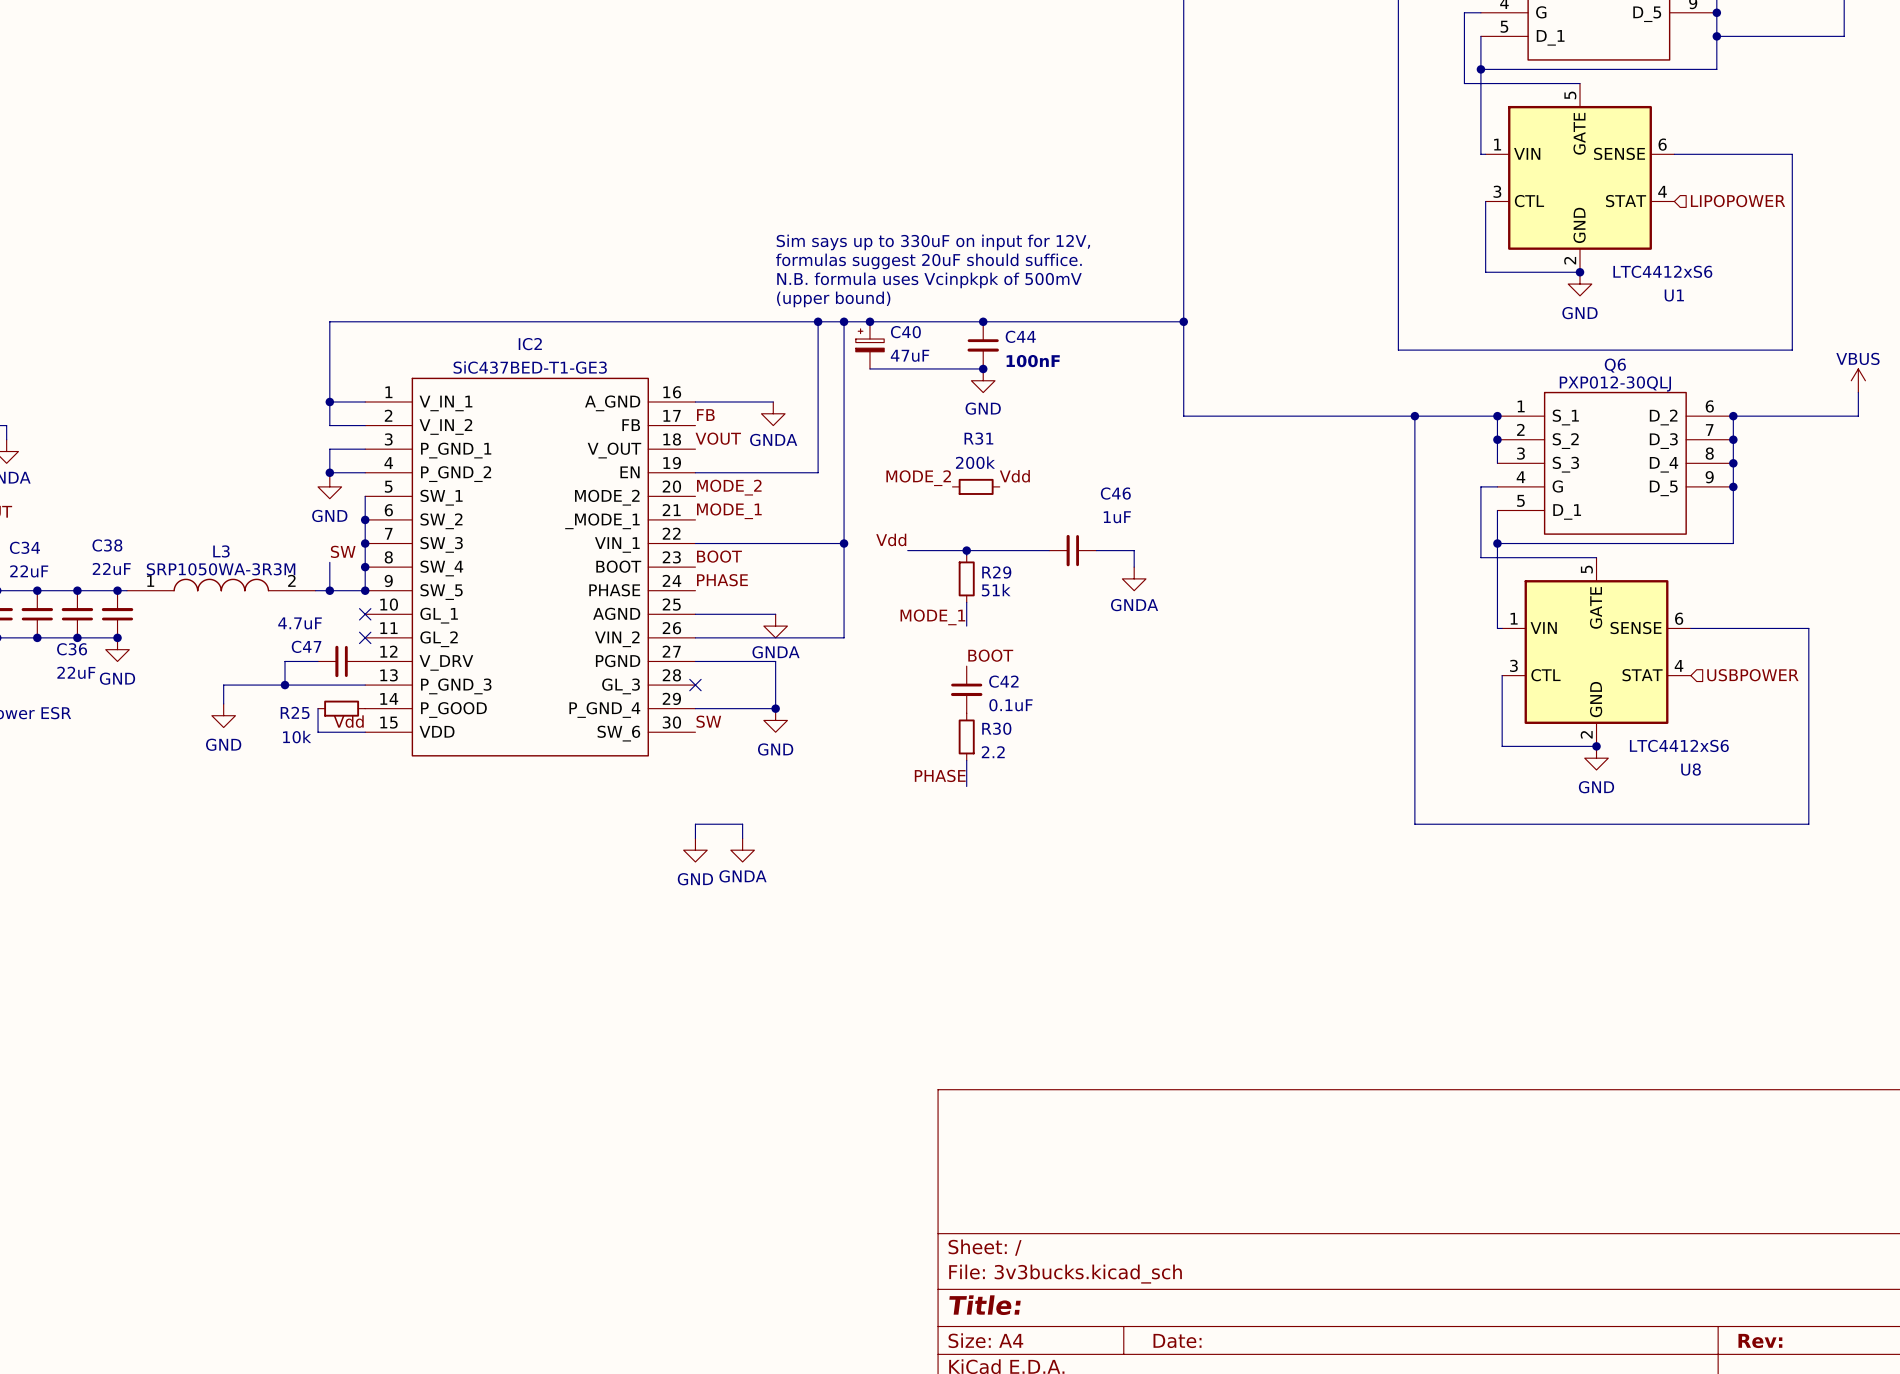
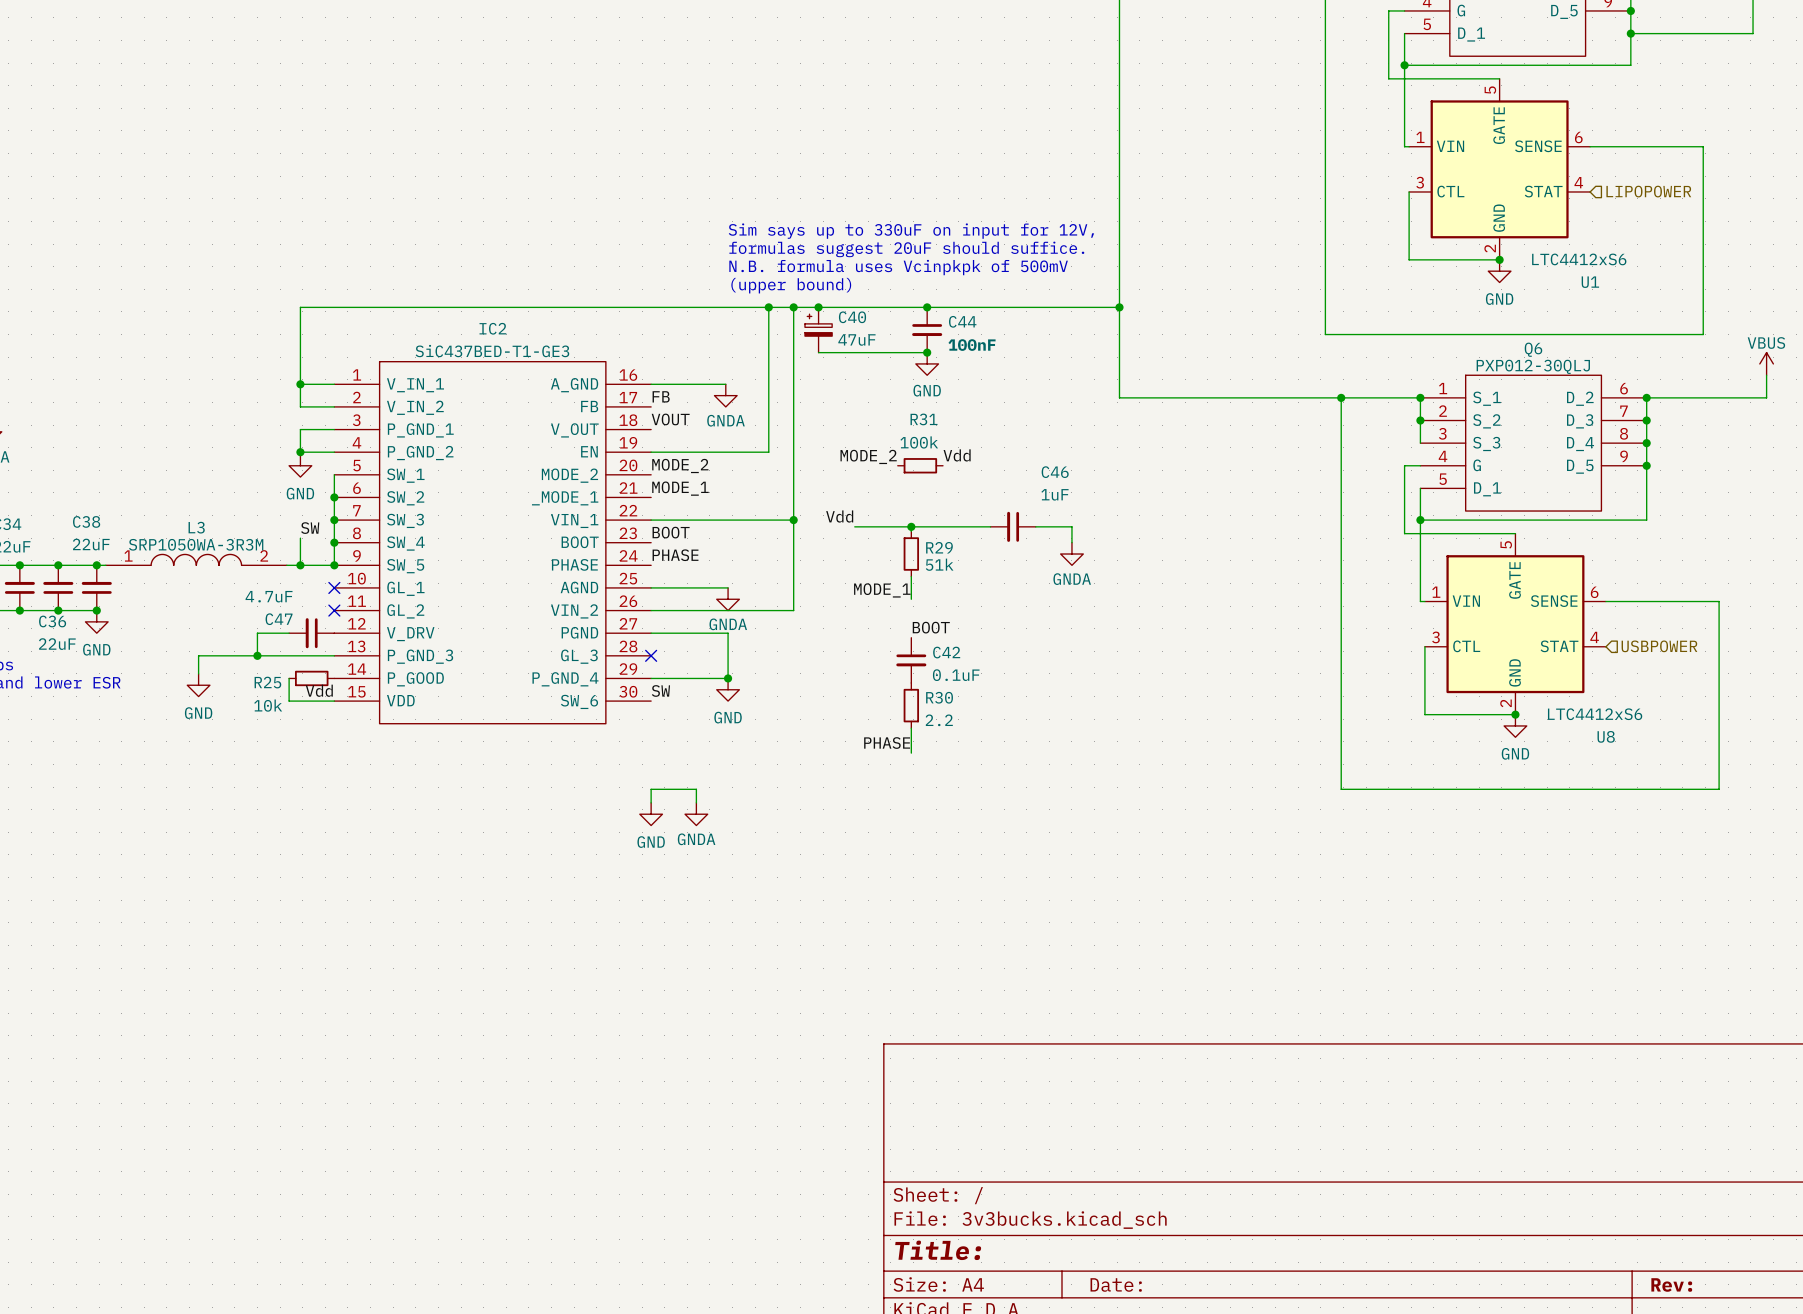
R31 value: 200k (975, 462) -> 100k (919, 442)

